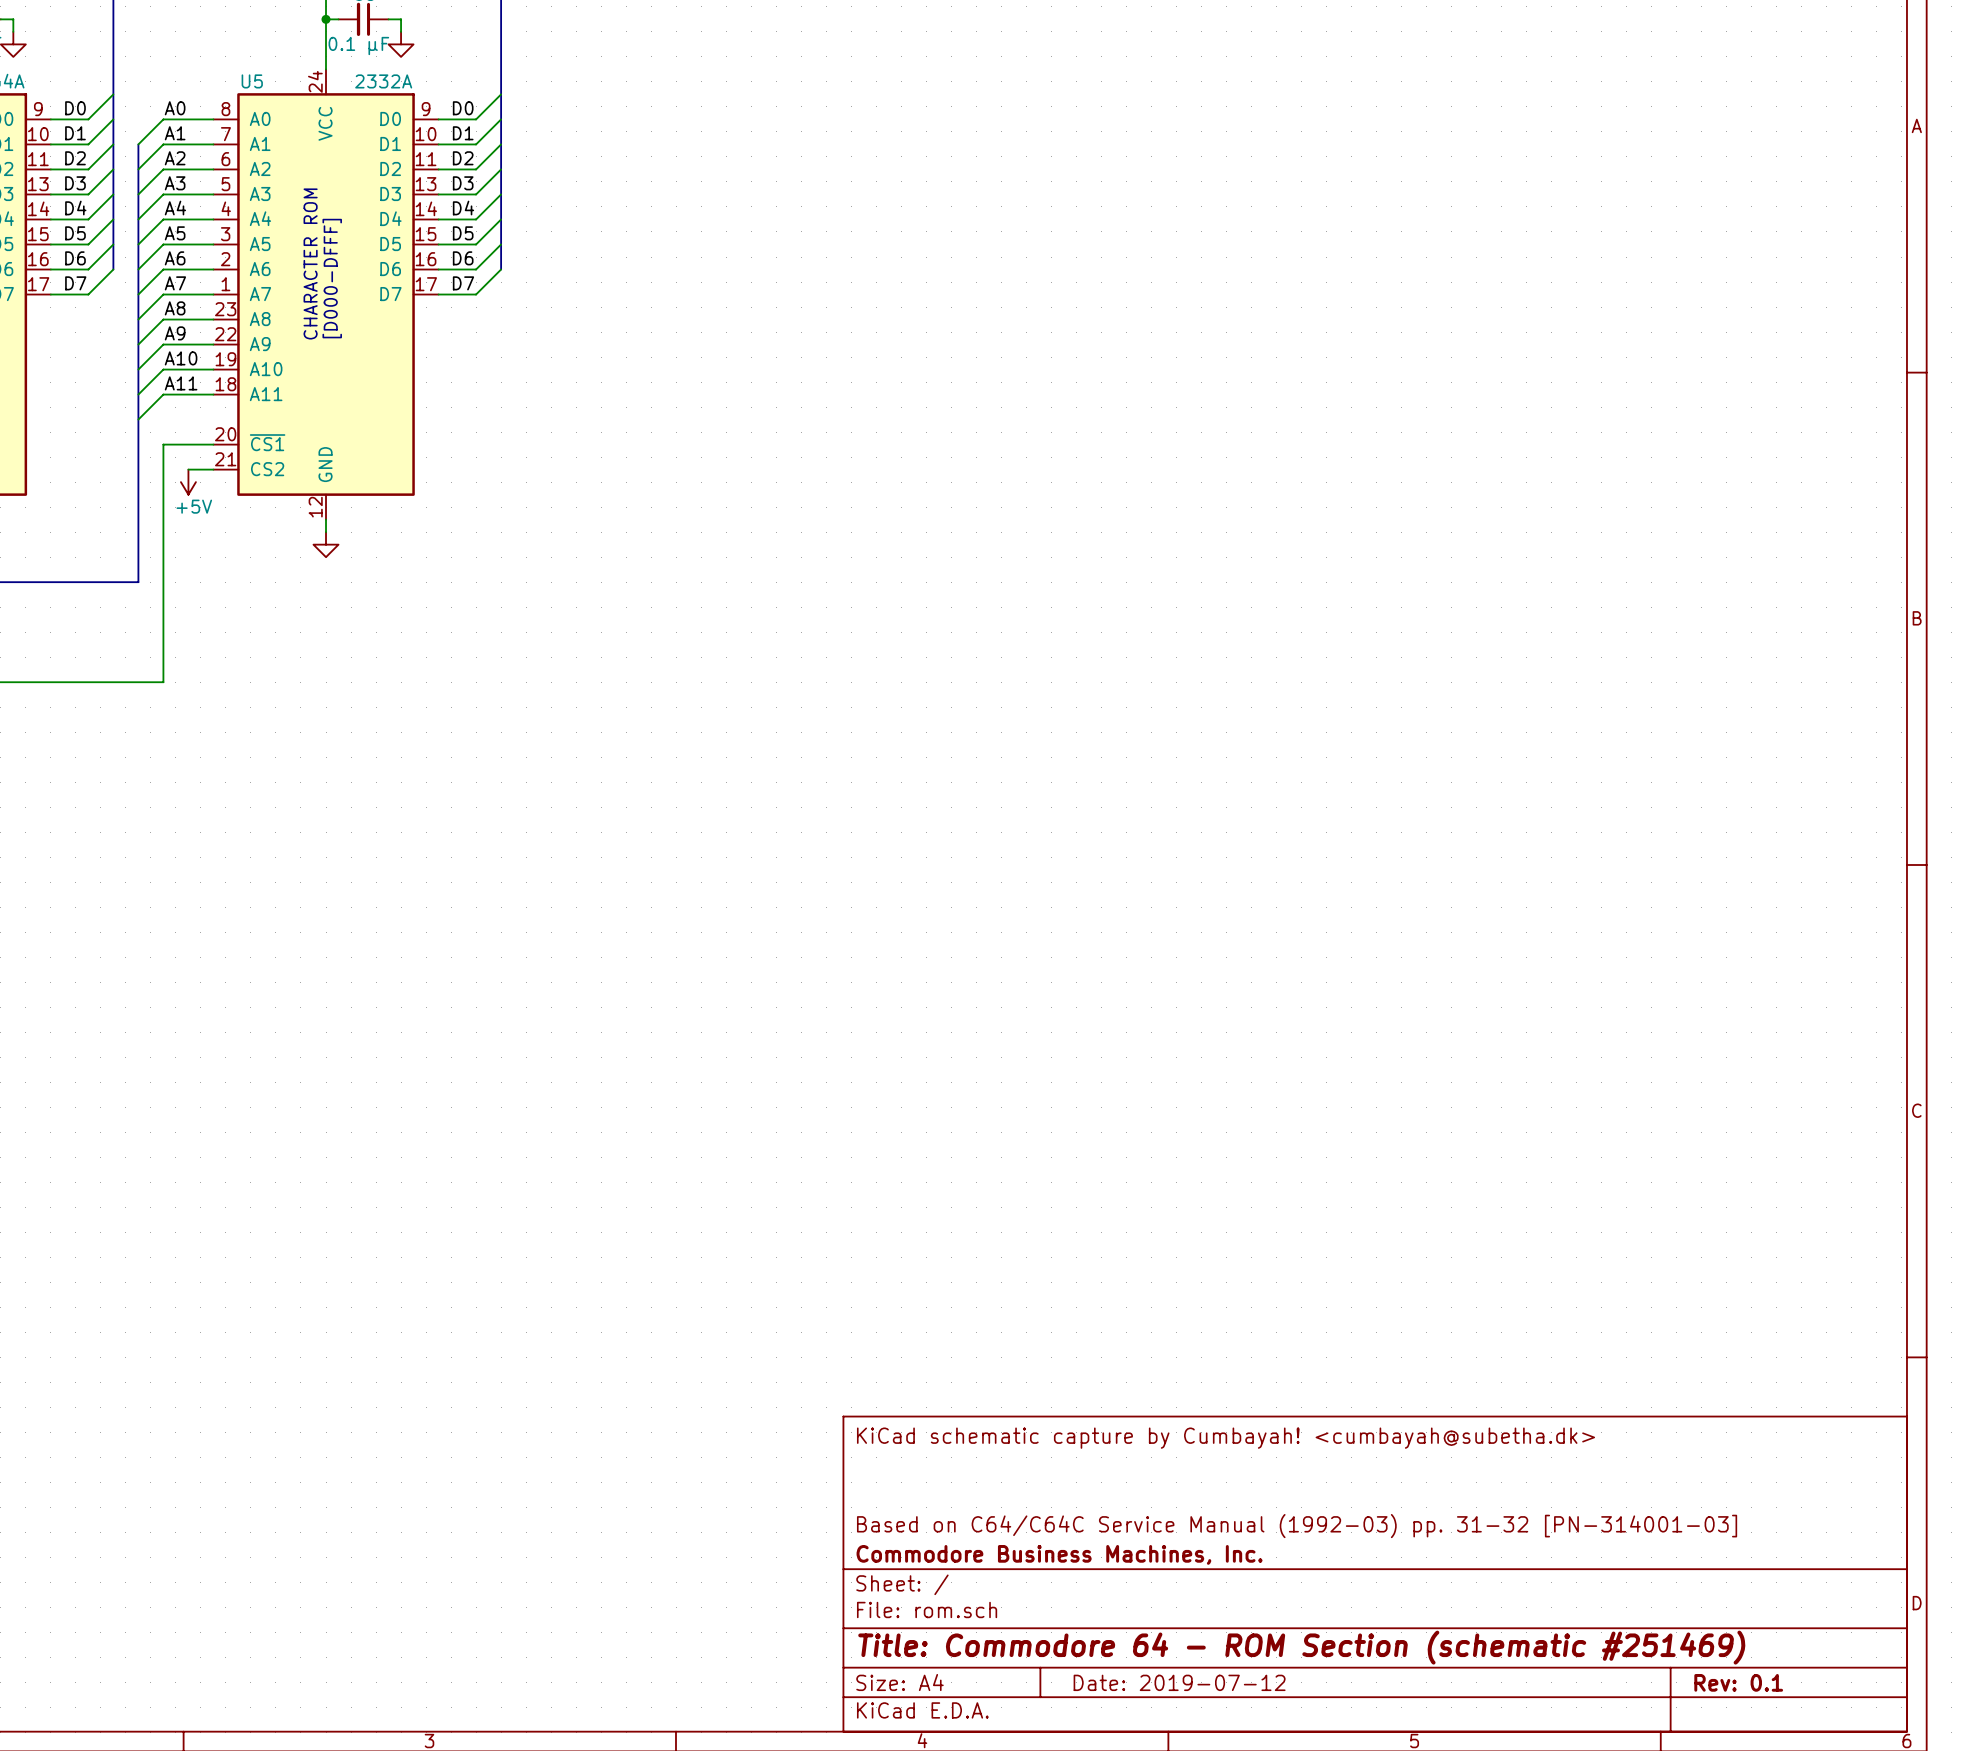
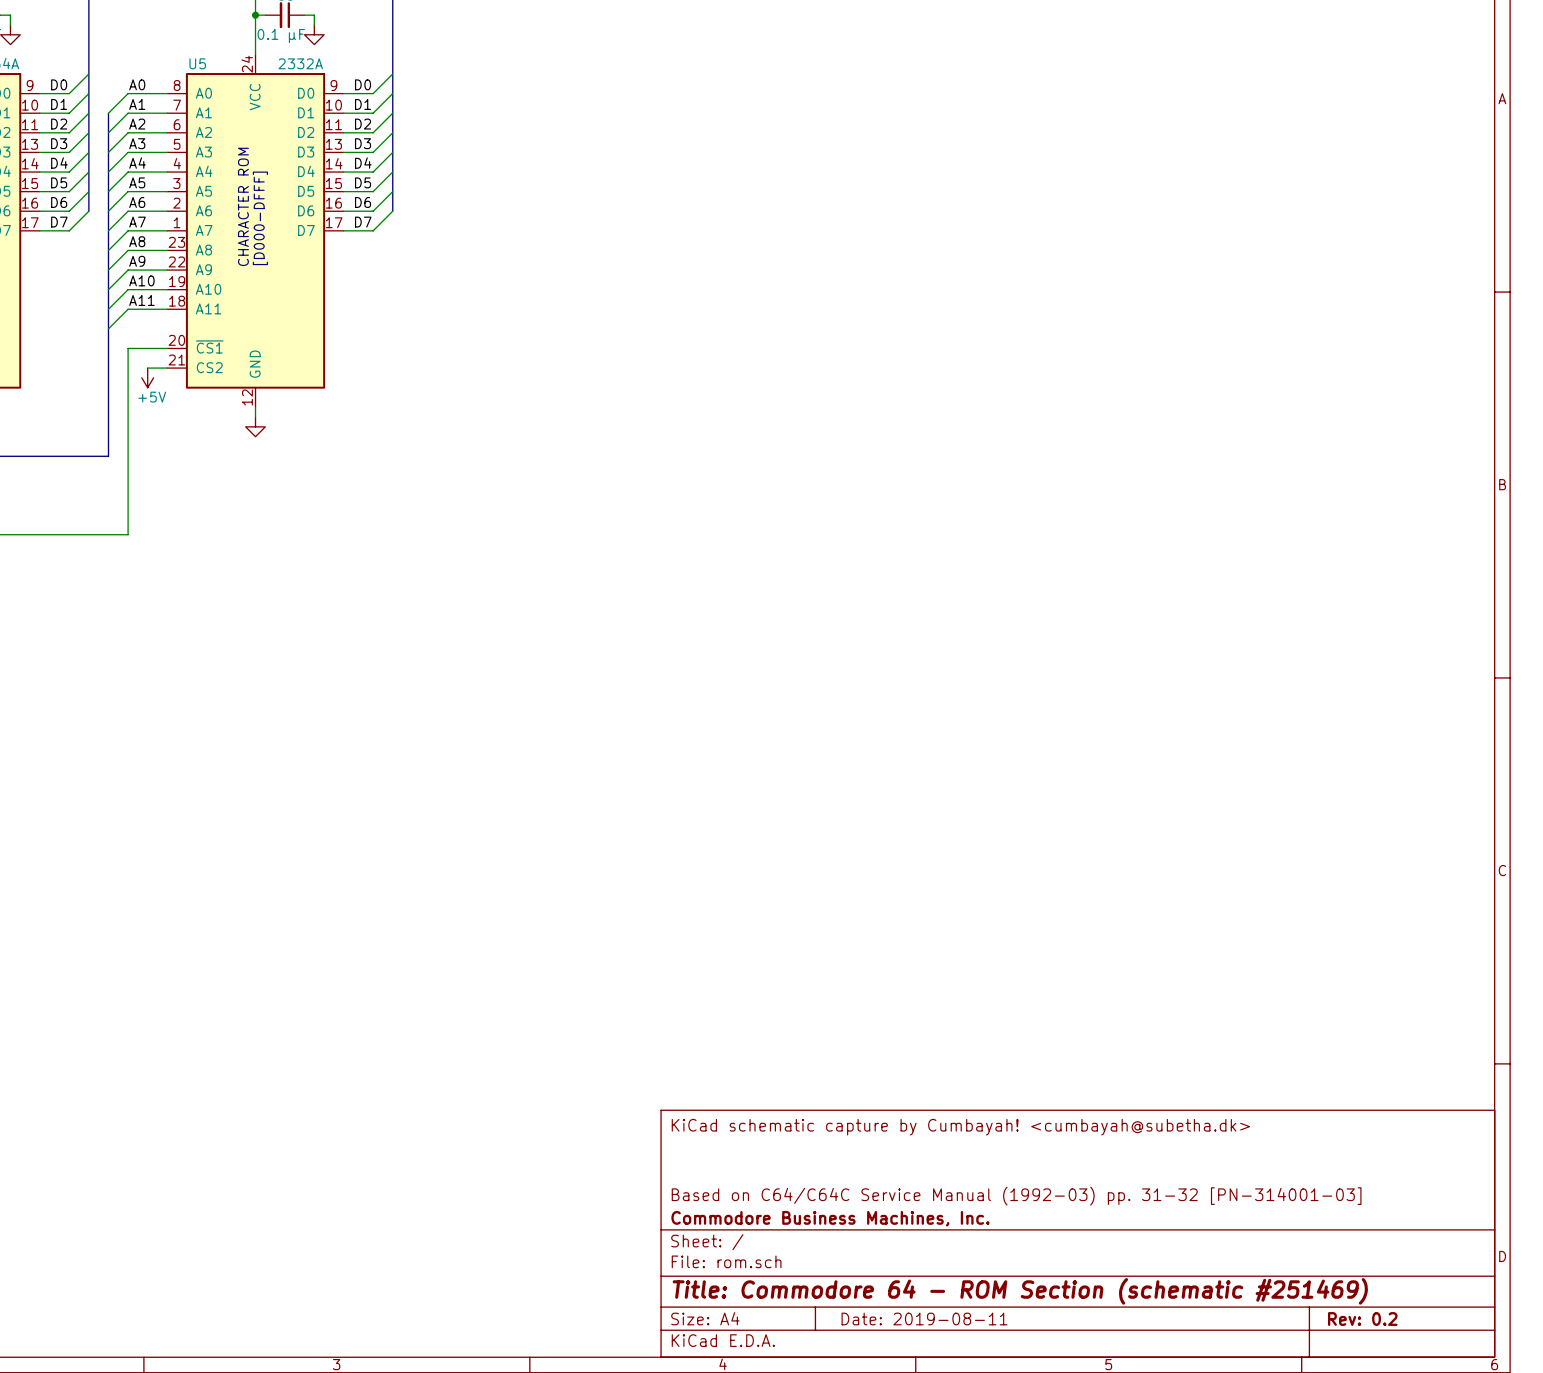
title block: Date: 2019-07-12 (1179, 1682) -> Date: 2019-08-11 (924, 1319)
title block: Rev: 0.1 (1738, 1682) -> Rev: 0.2 (1362, 1319)

